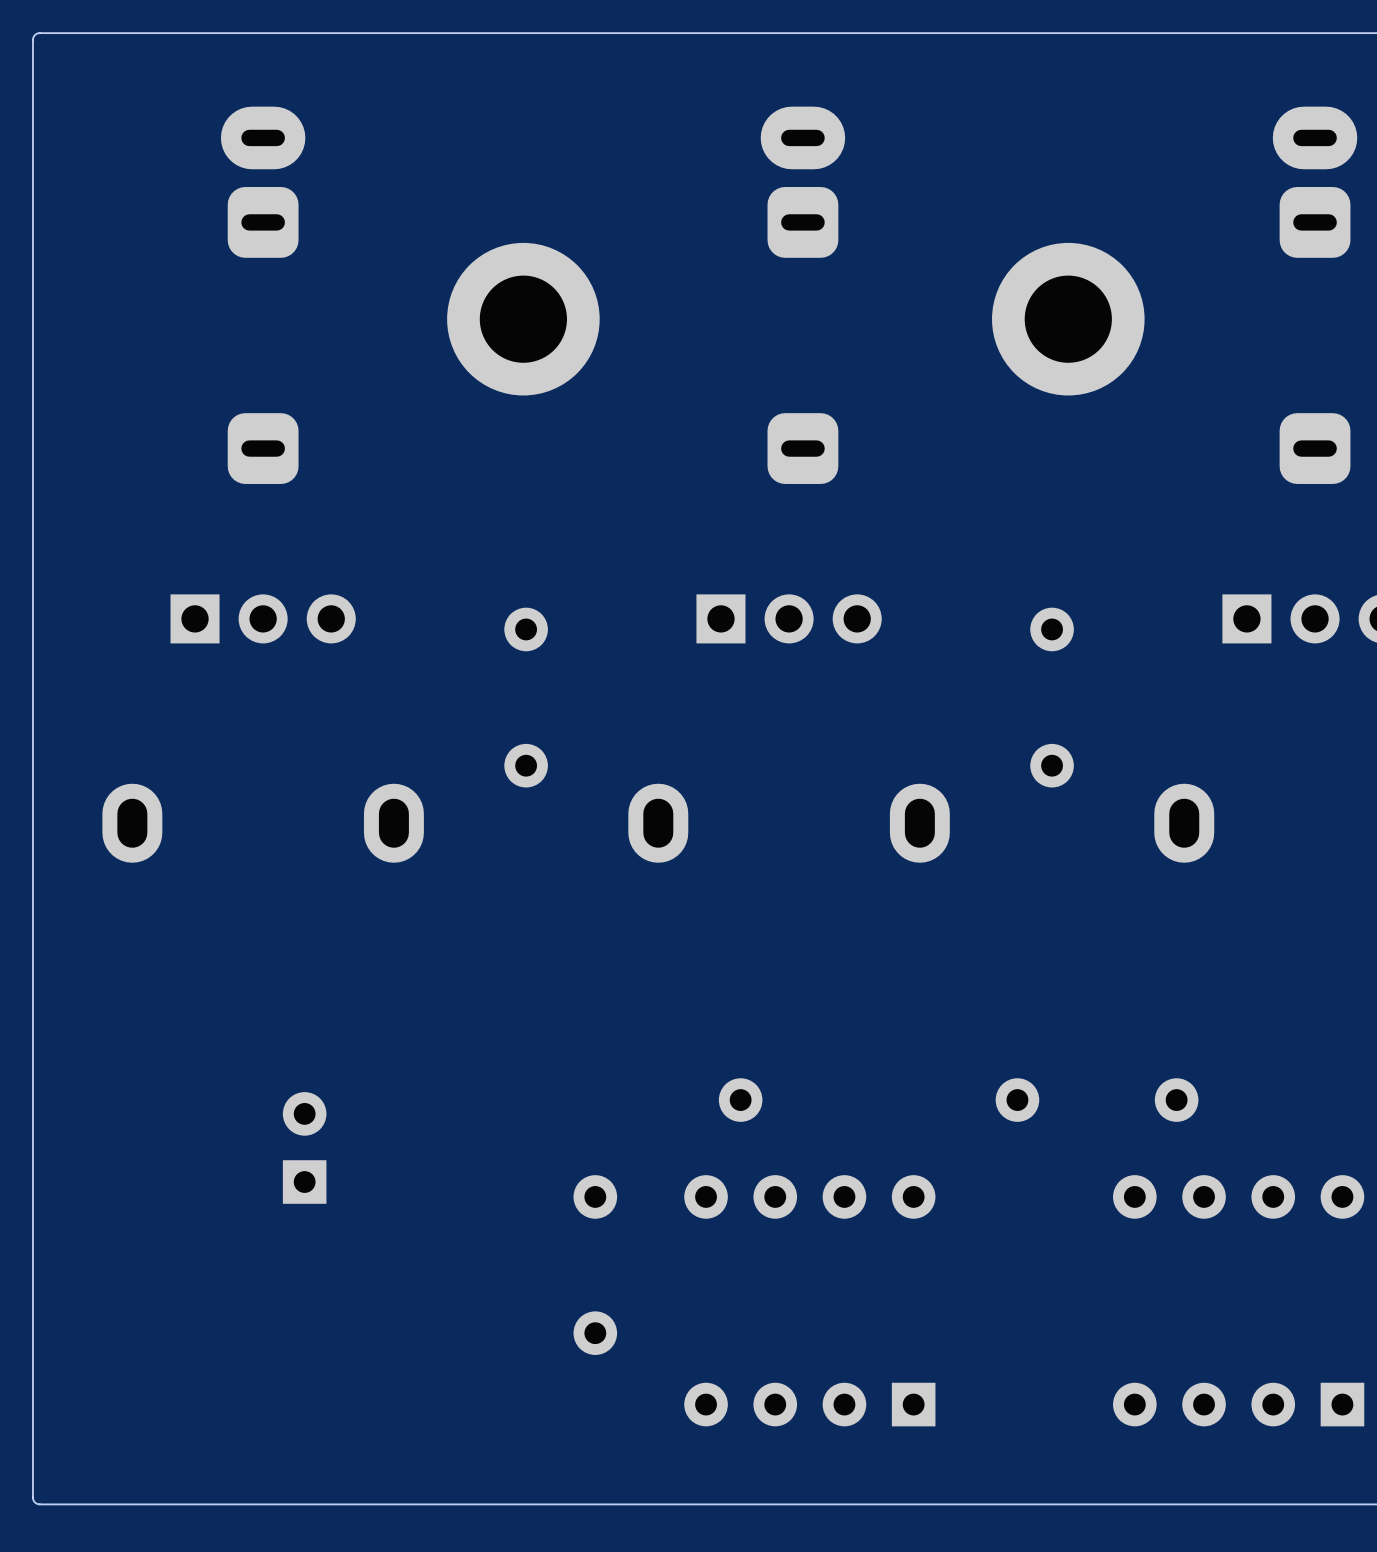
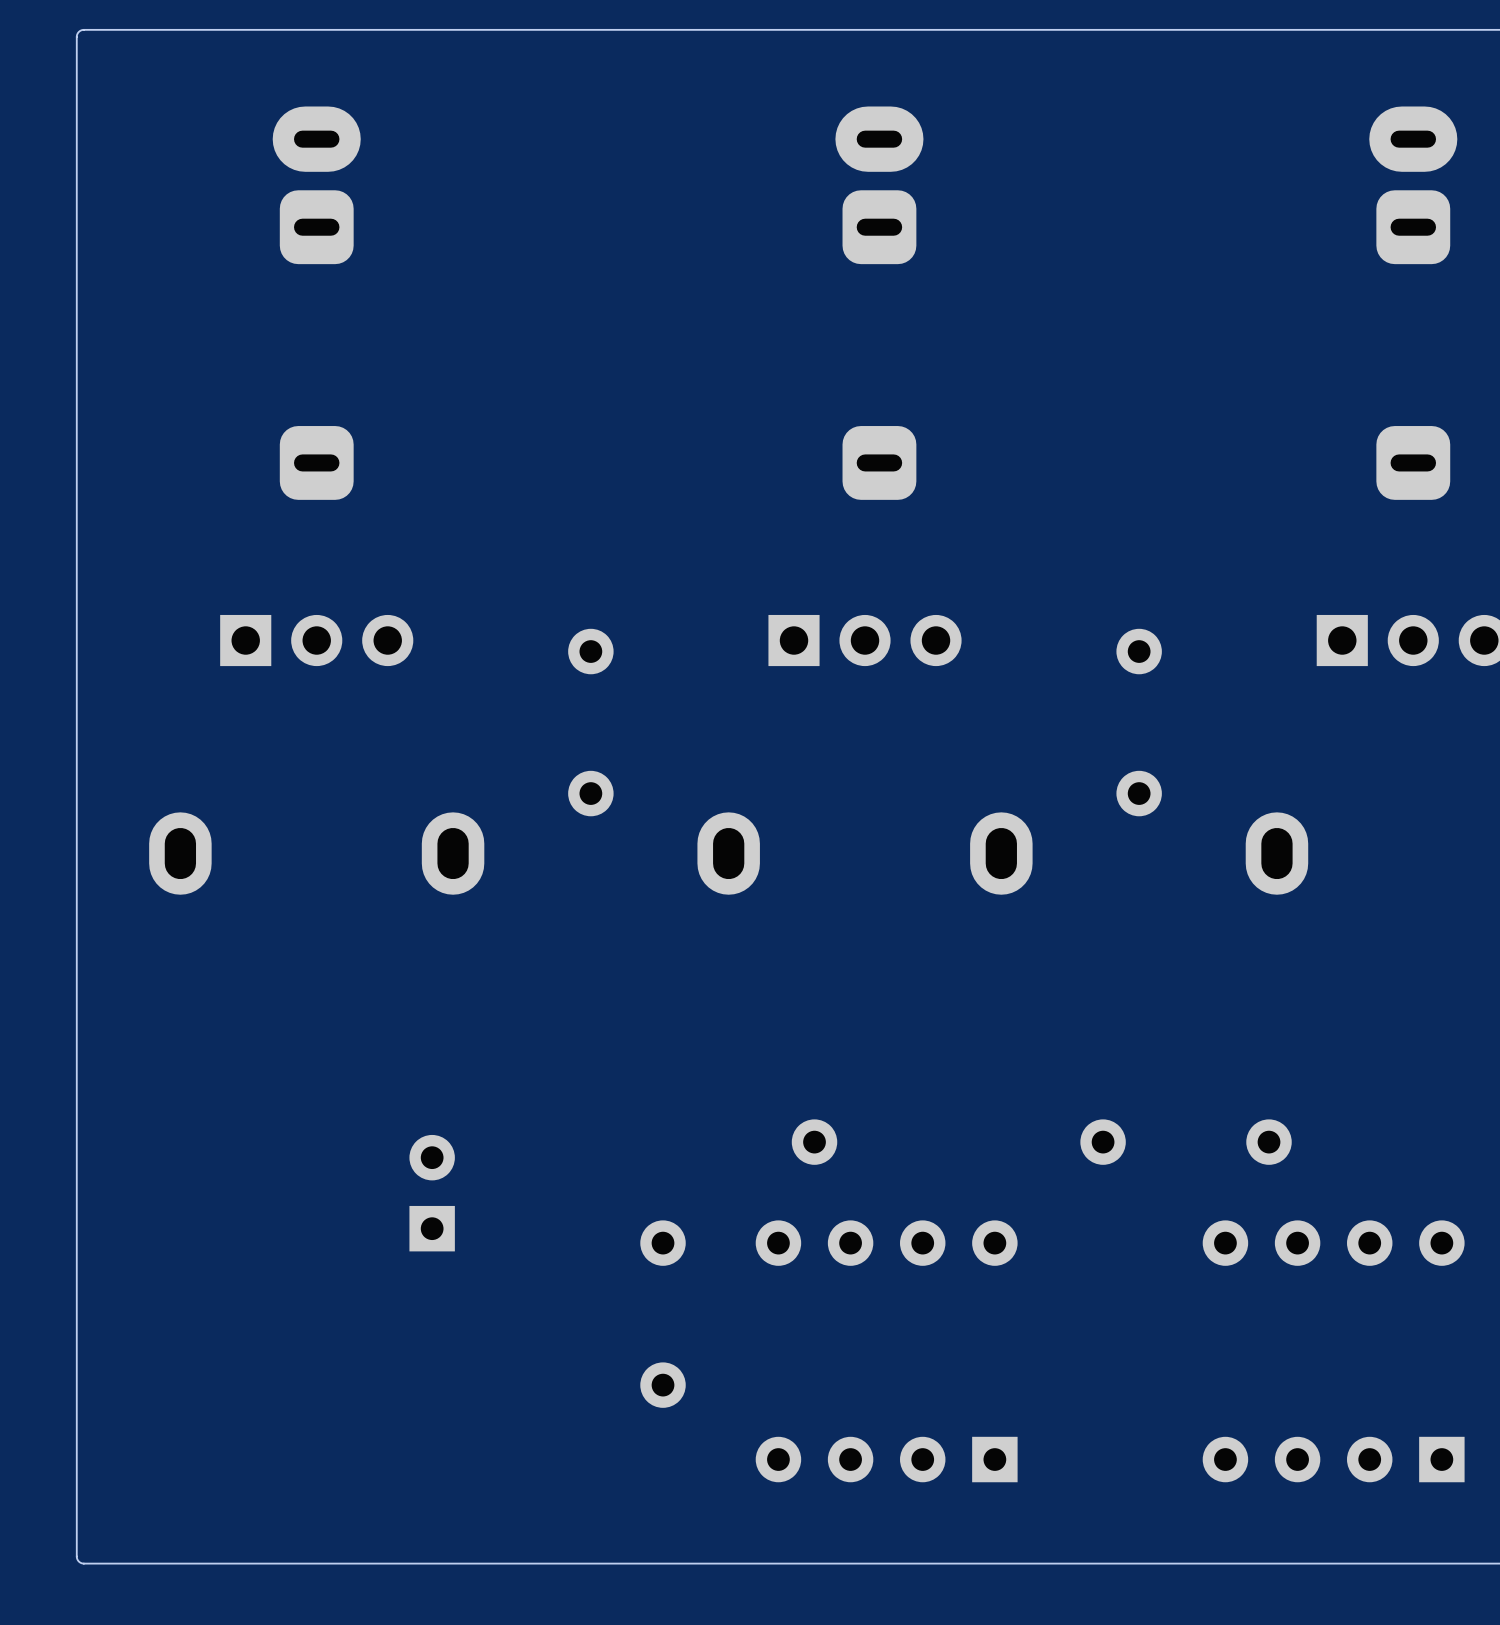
part: (523, 319) -> none
part: (1068, 319) -> none
part position: (304, 1147) -> (432, 1193)

